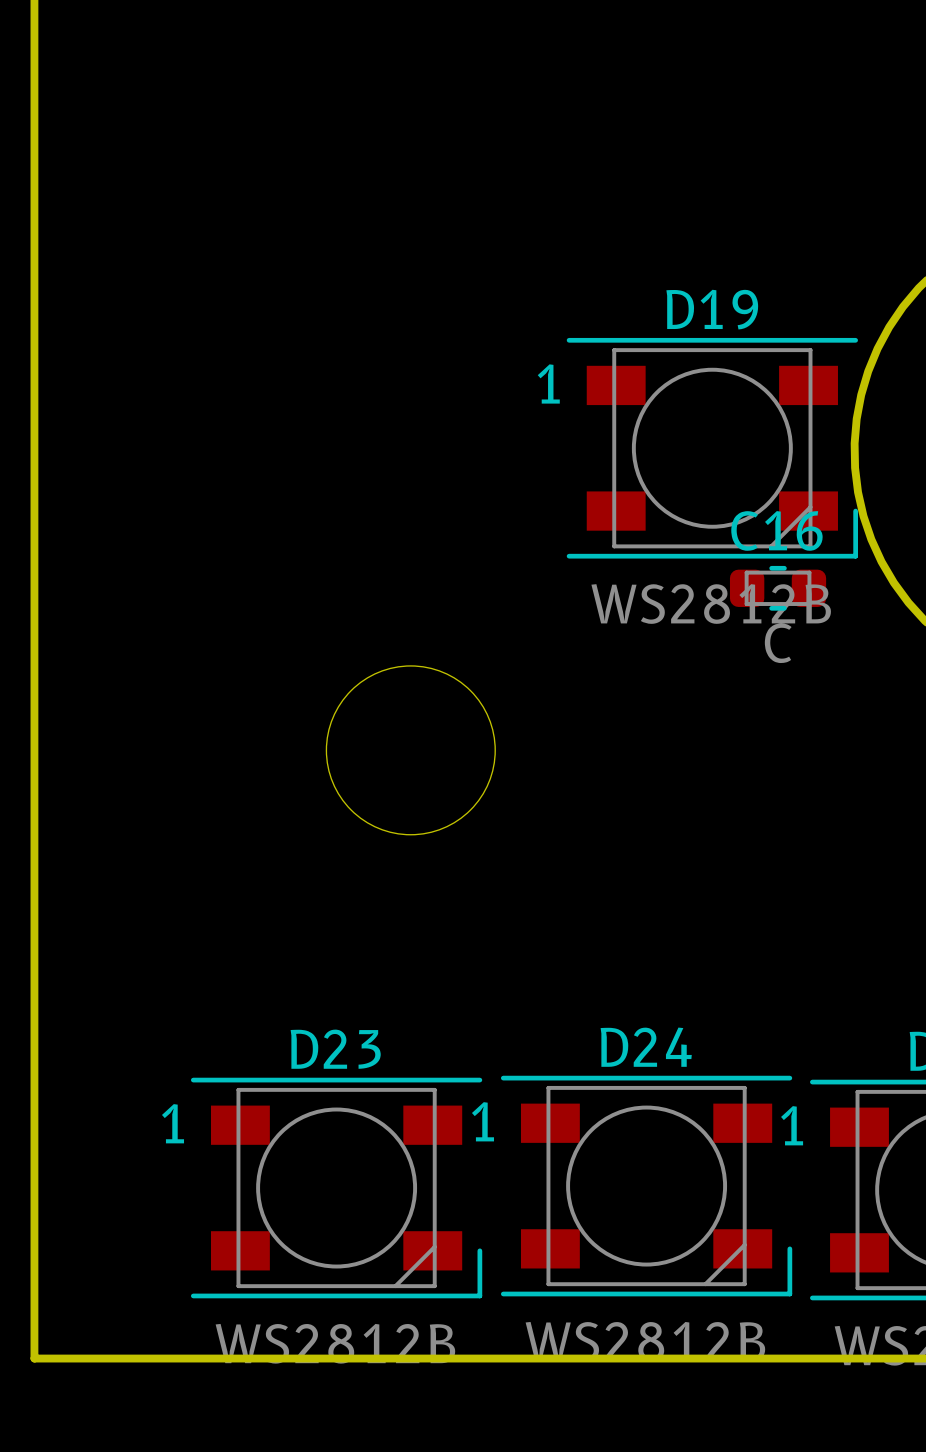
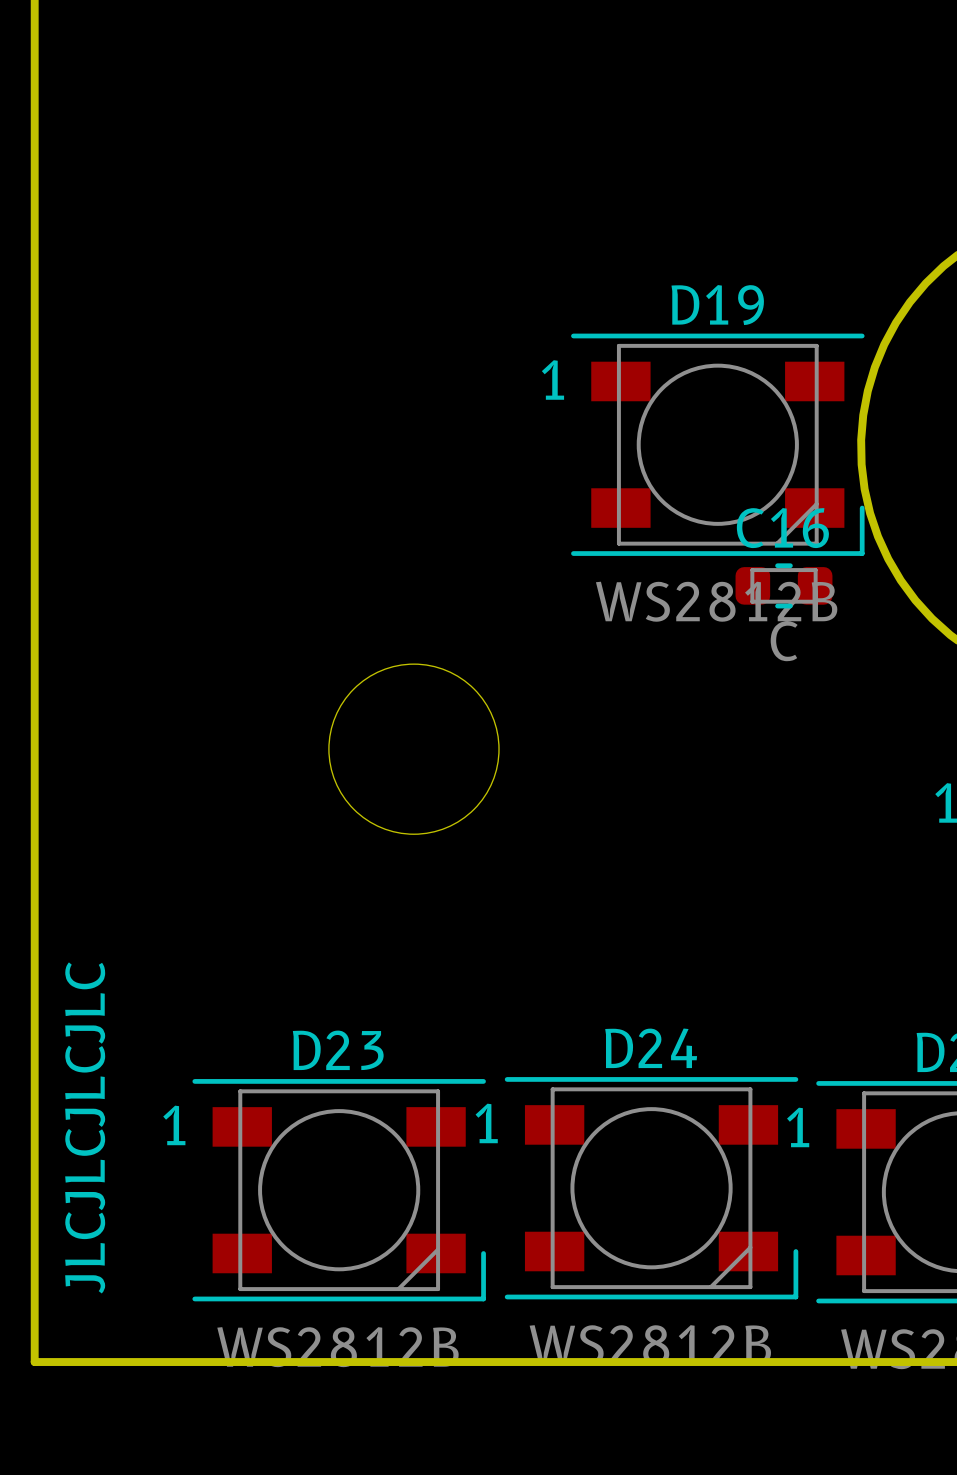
text: none -> JLCJLCJLCJLC (85, 1127)

